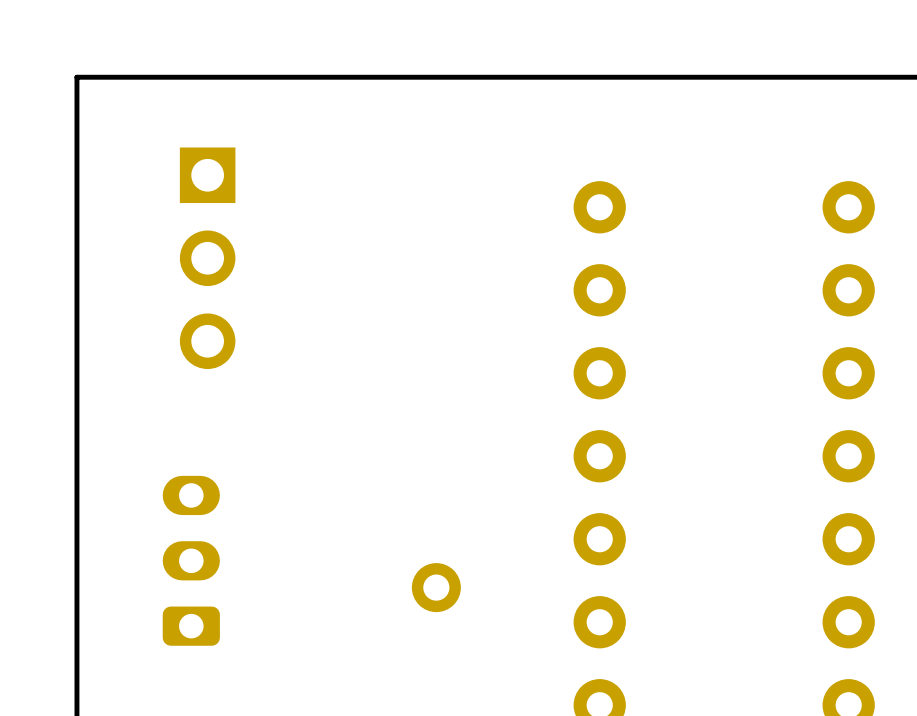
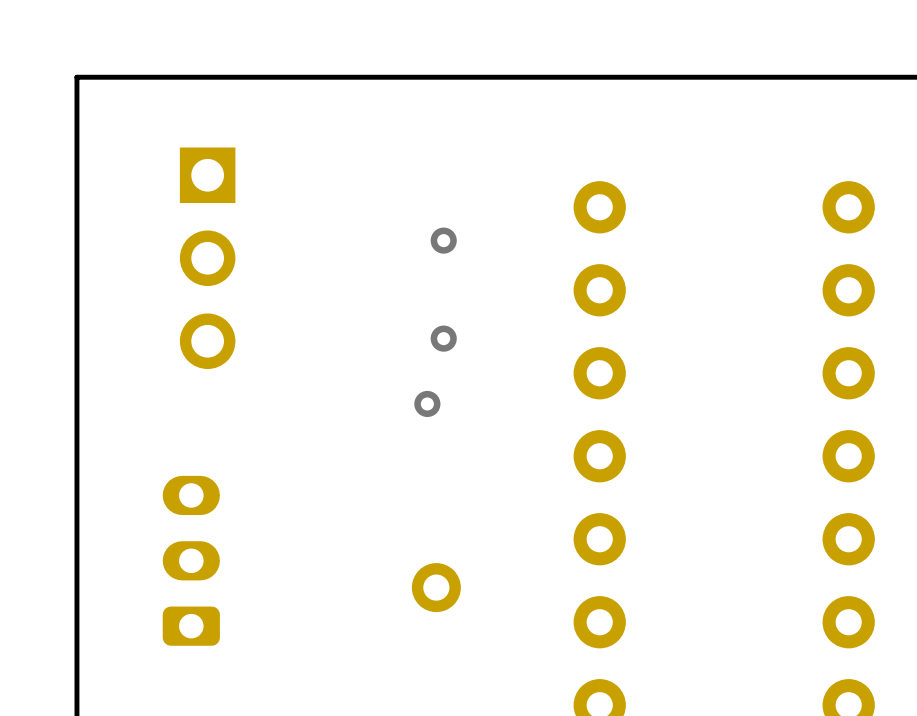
via: none -> (443, 240)
via: none -> (443, 338)
via: none -> (427, 403)

